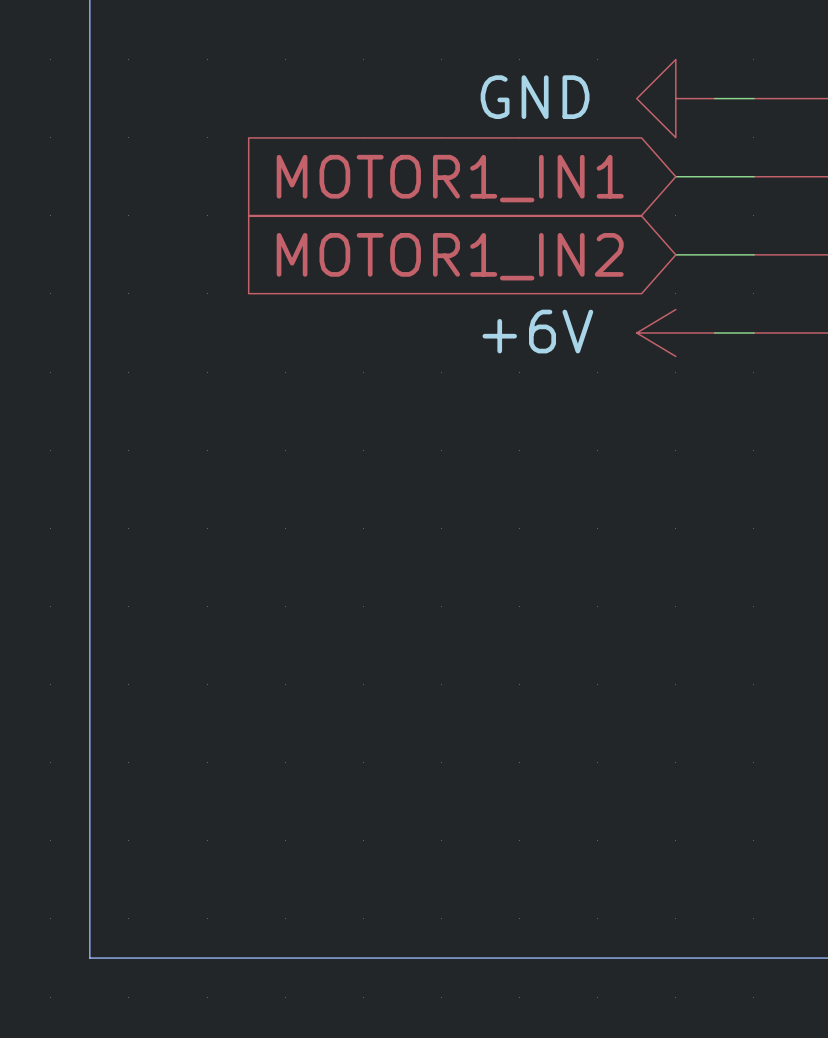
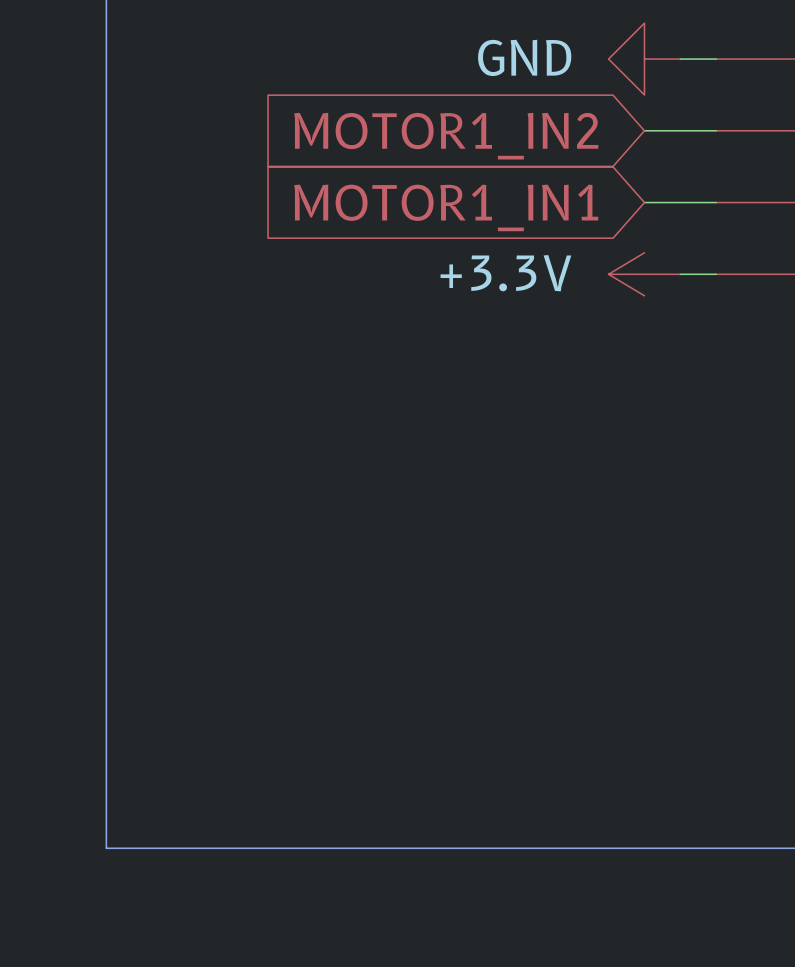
global label: MOTOR1_IN1 (450, 178) -> MOTOR1_IN2 (446, 136)
global label: MOTOR1_IN2 (450, 256) -> MOTOR1_IN1 (446, 207)
power symbol: +6V (675, 333) -> +3.3V (644, 274)

